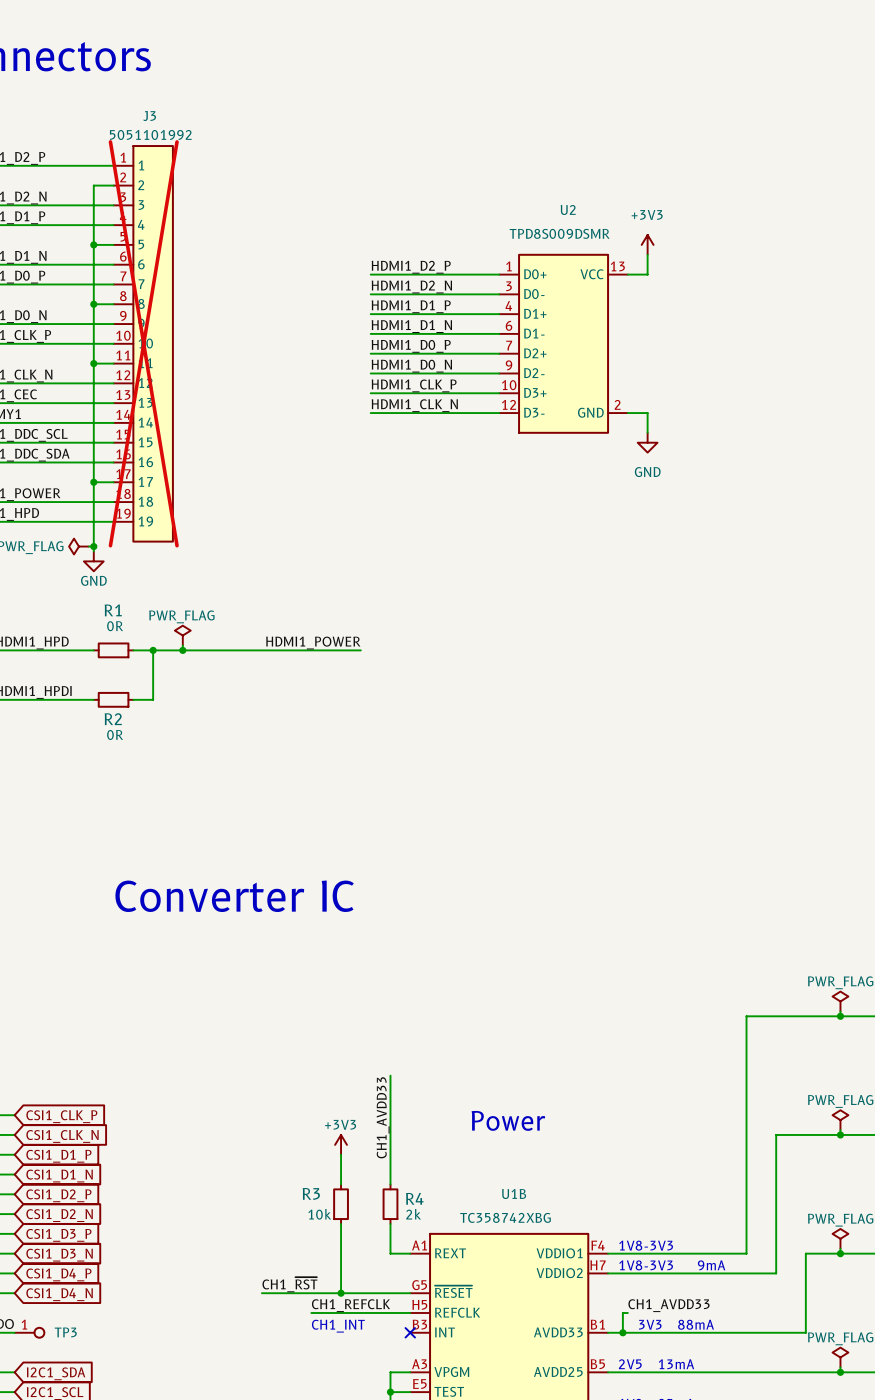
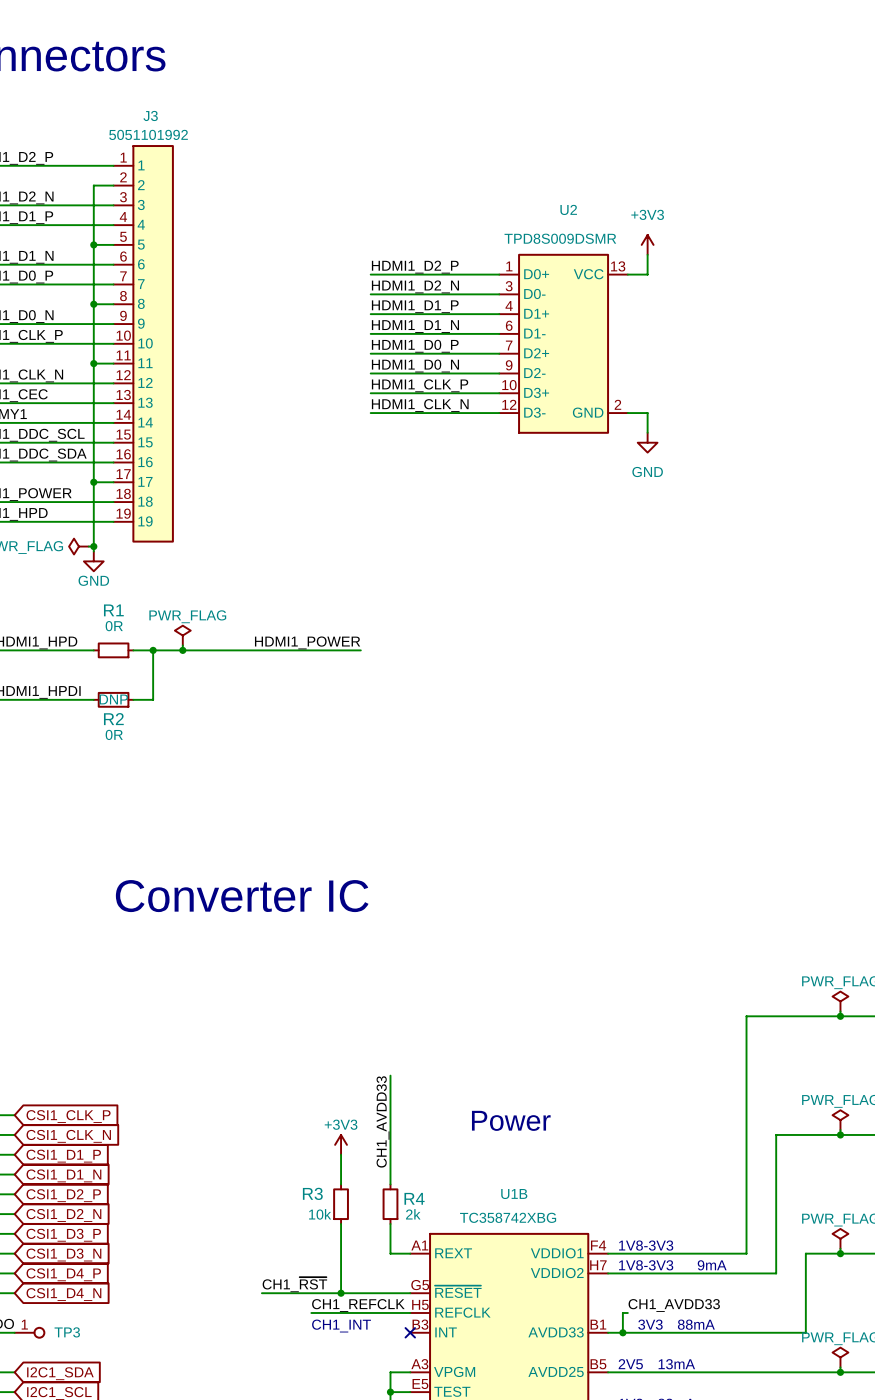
U2 text: TPD8S009DSMR (559, 233) -> none
U2 value: none -> TPD8S009DSMR (560, 238)
J3 do-not-place cross: (143, 343) -> none
R2 text: none -> DNP (113, 699)

